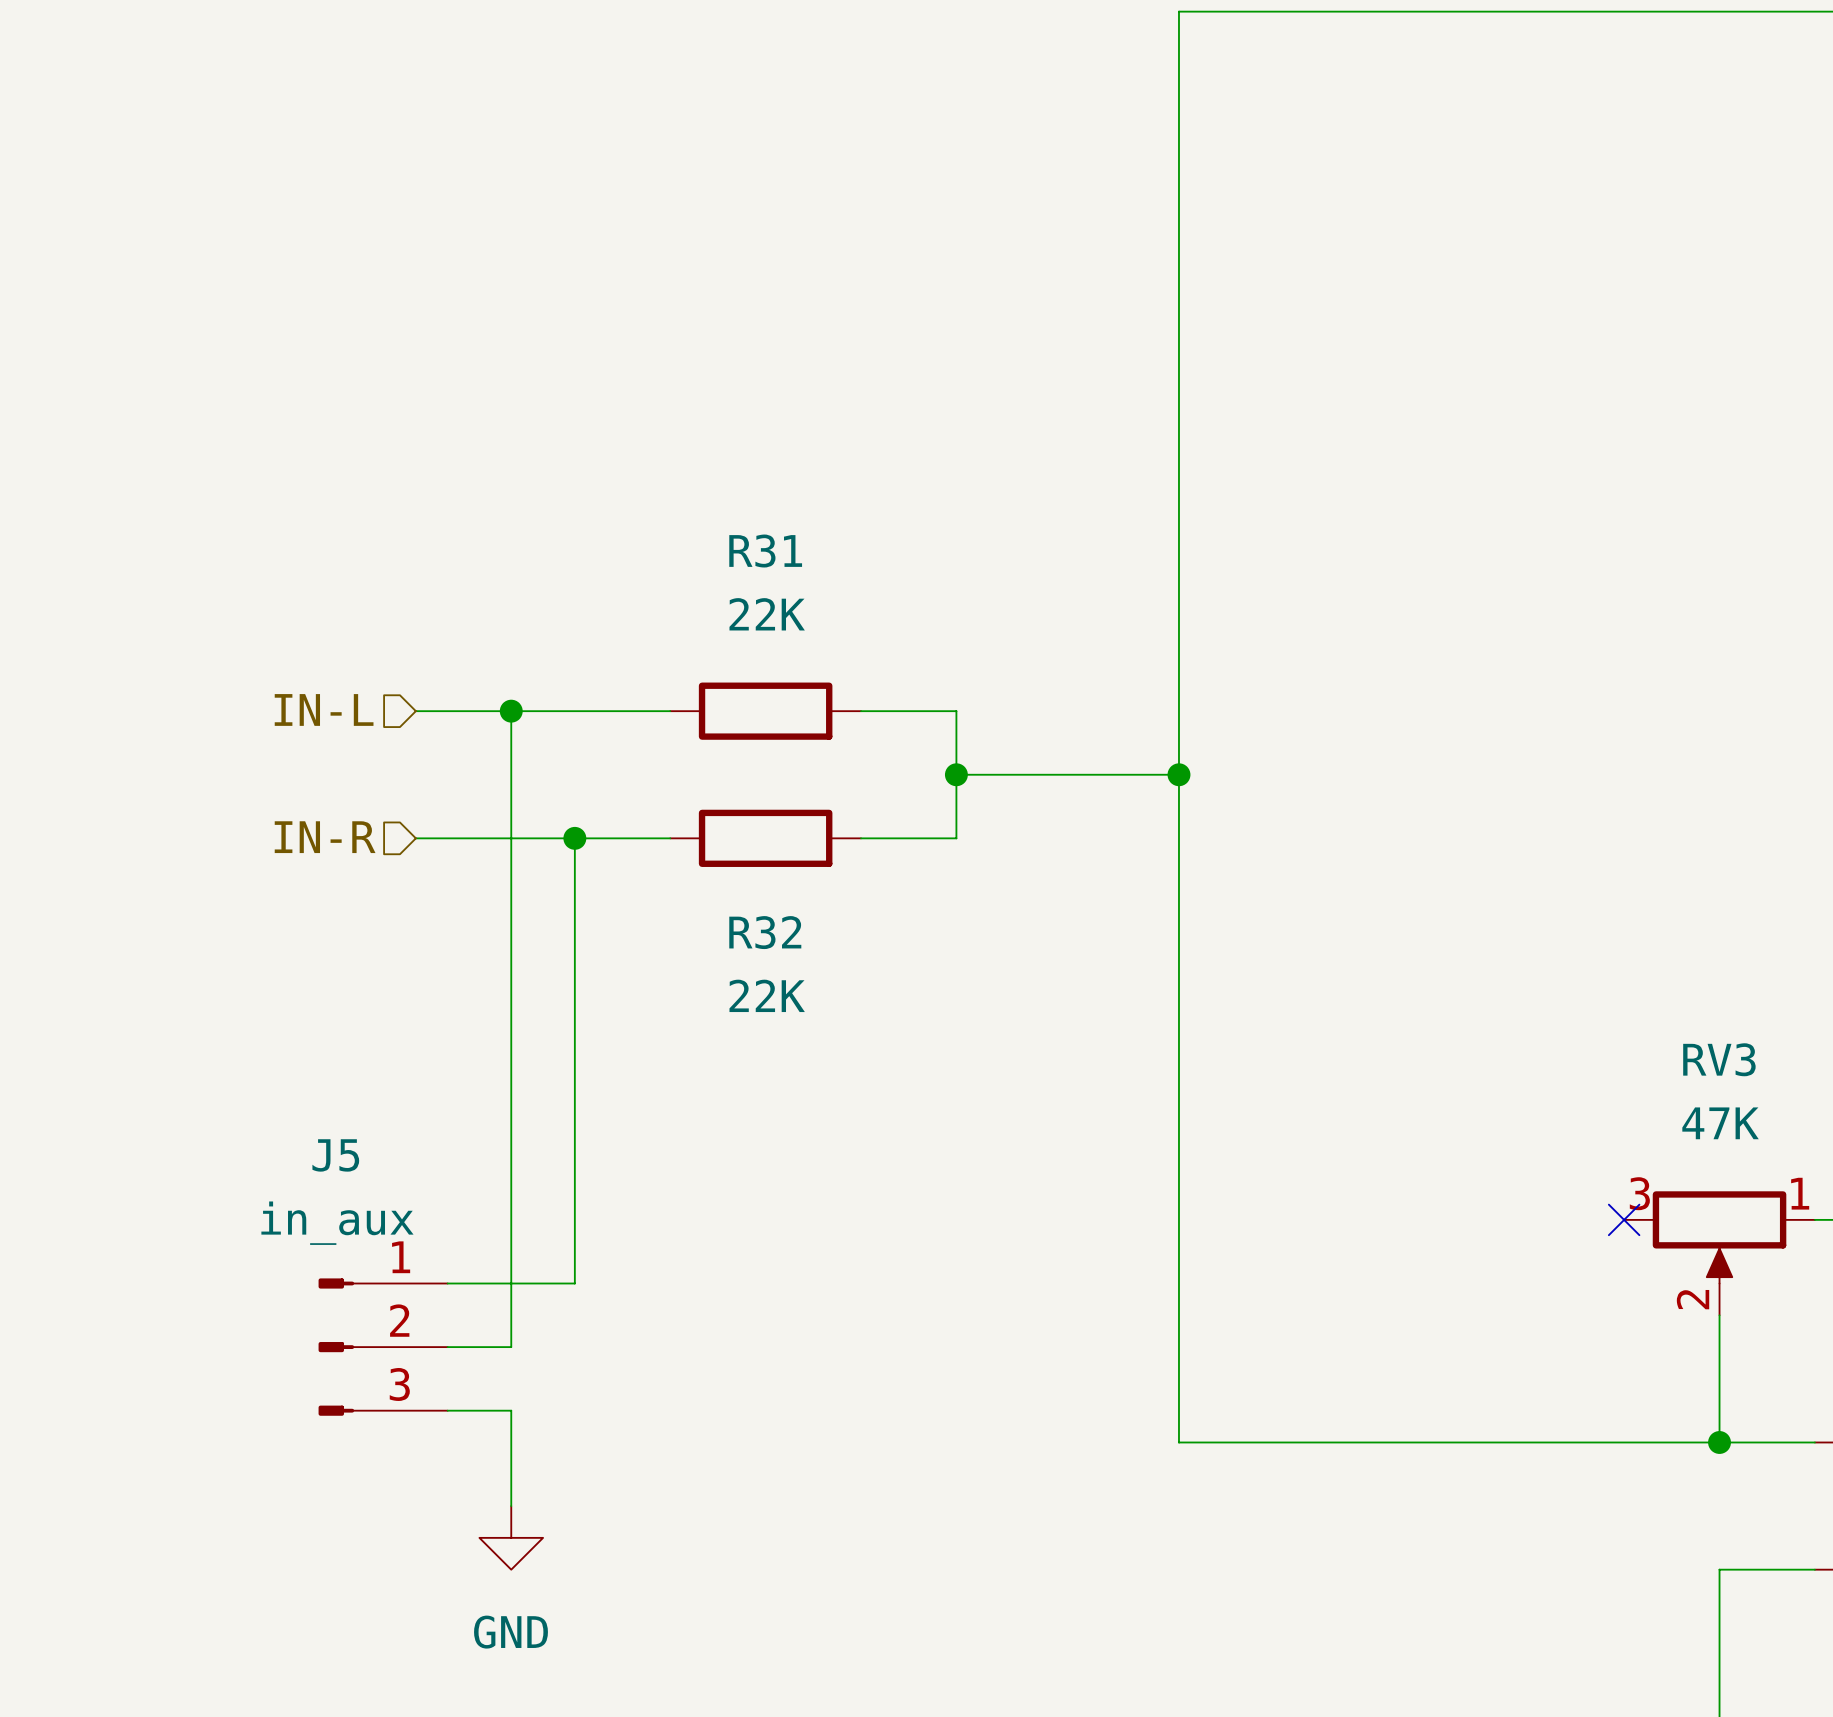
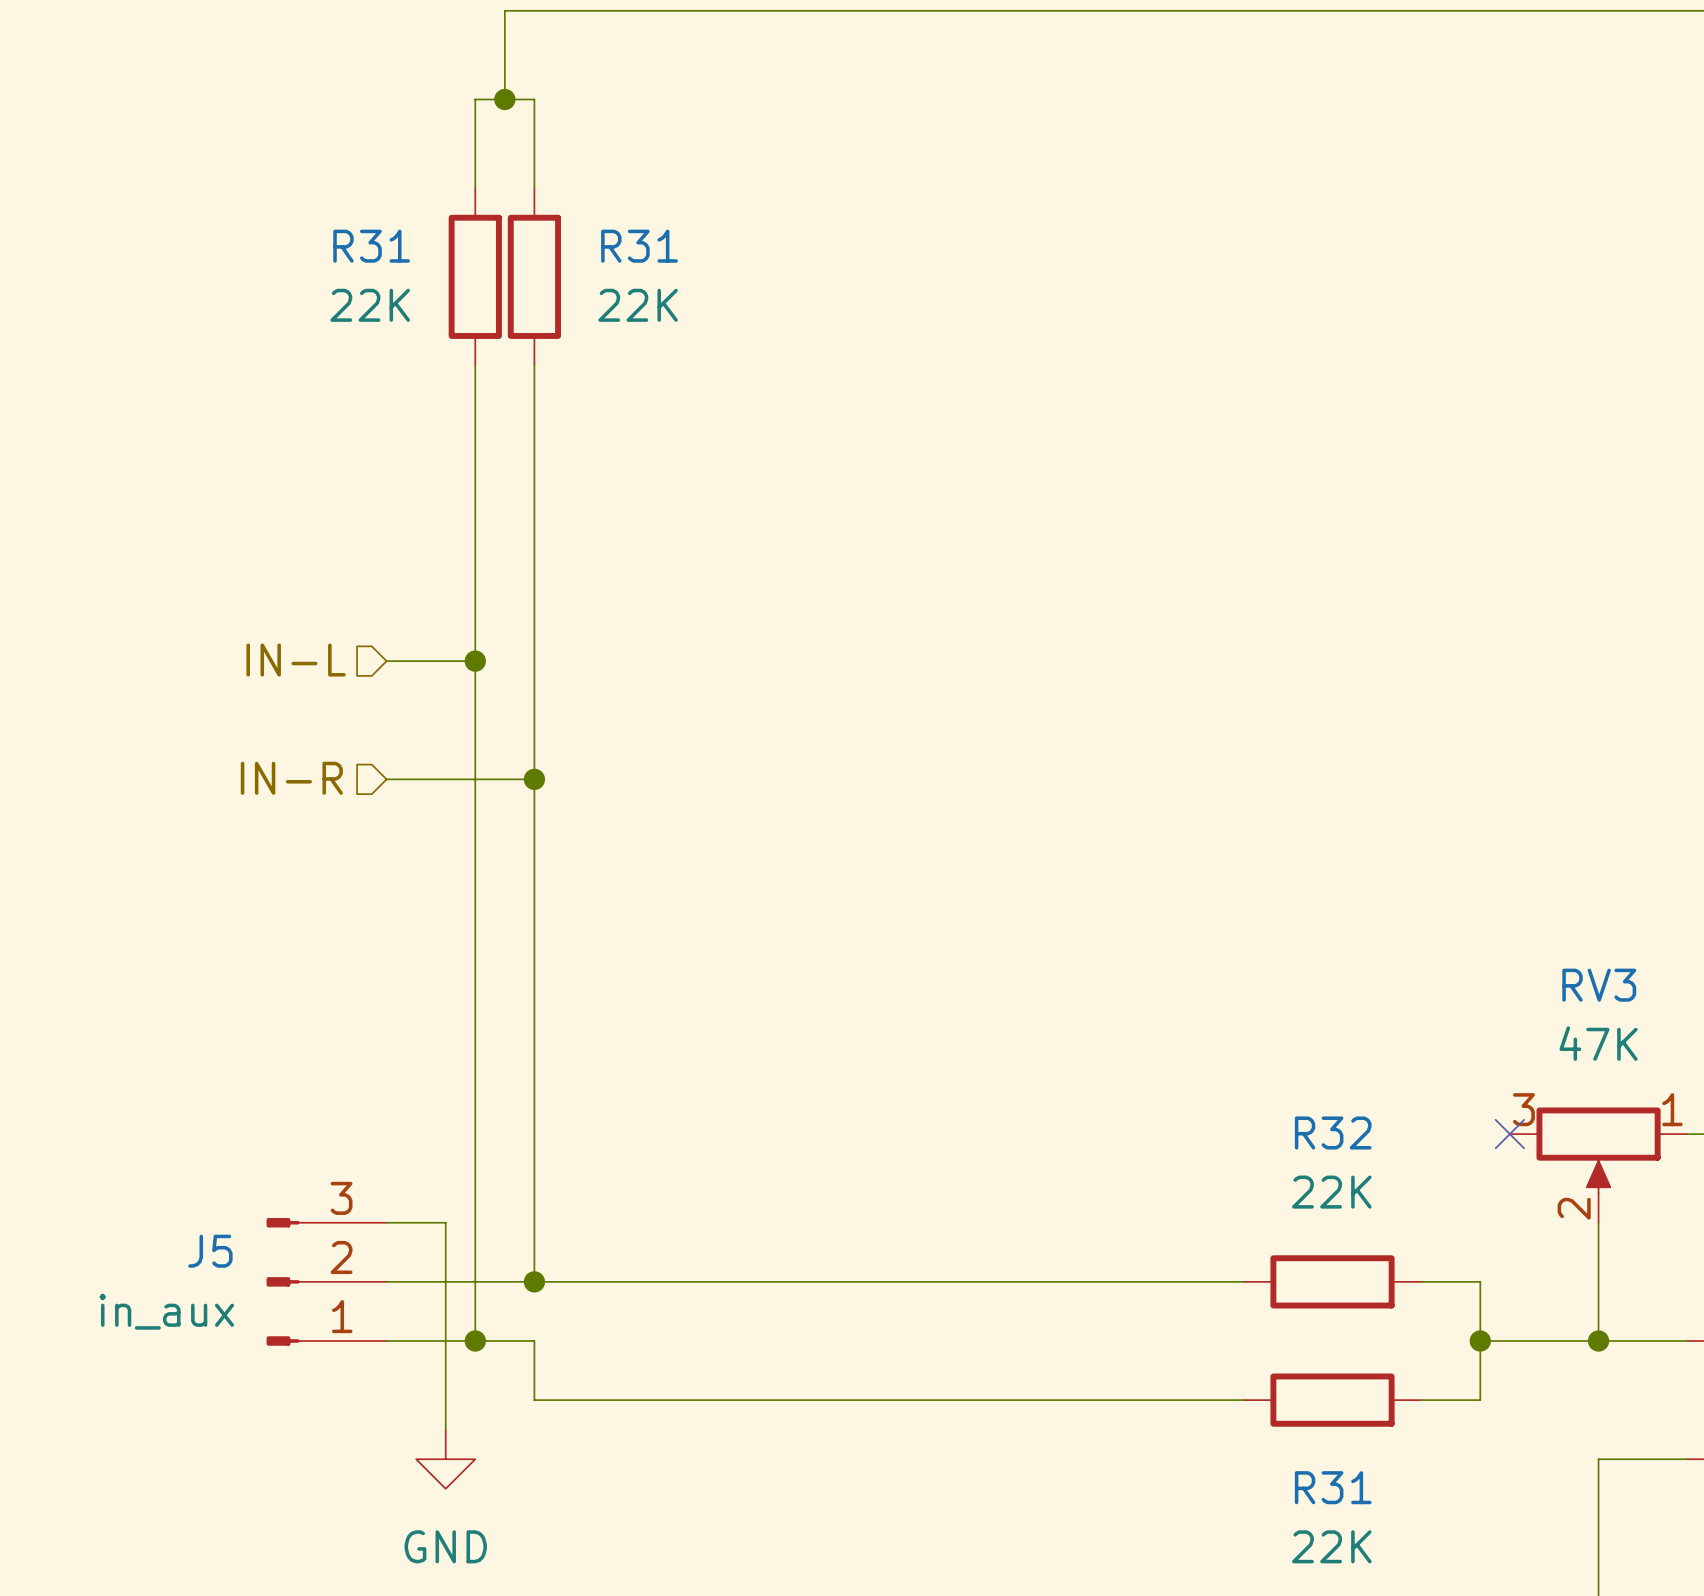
wire: (1178, 11) (1178, 1442) (1592, 1442) -> (1096, 10) (504, 10) (504, 99)
junction: none -> (504, 99)
wire: none -> (475, 188) (475, 99) (534, 99) (534, 188)
R31: none -> 22K (475, 276)
R31: none -> 22K (534, 276)
wire: (511, 711) (670, 711) -> (475, 661) (475, 365)
R31: 22K (765, 711) -> none
wire: (861, 711) (956, 711) (956, 838) (861, 838) -> none
wire: (956, 774) (1178, 774) -> none
junction: (956, 774) -> none
junction: (1178, 774) -> none
wire: (574, 838) (670, 838) -> (534, 779) (534, 365)
R32 position: (765, 838) -> (1332, 1281)
R32 name position: R32 (765, 932) -> R32 (1333, 1132)
R32 value position: 22K (767, 995) -> 22K (1331, 1192)
J5 name position: J5 (335, 1155) -> J5 (210, 1251)
J5 value position: in_aux (337, 1223) -> in_aux (166, 1311)
wire: (447, 1283) (574, 1283) -> (534, 1281) (534, 1193)
wire: none -> (386, 1222) (445, 1222) (445, 1429)
J5 flip: as is (336, 1347) -> up-down (283, 1281)
wire: (447, 1347) (511, 1347) -> (475, 1311) (475, 1252)
wire: none -> (386, 1281) (1243, 1281)
junction: none -> (534, 1281)
wire: none -> (1421, 1281) (1480, 1281) (1480, 1400) (1421, 1400)
wire: (447, 1410) (511, 1410) -> none
wire: none -> (386, 1340) (534, 1340) (534, 1400) (1243, 1400)
wire: (511, 1442) (511, 1506) -> none
junction: none -> (475, 1340)
junction: none -> (1480, 1340)
R31: none -> 22K (1332, 1400)
power symbol position: GND (511, 1537) -> GND (445, 1459)

